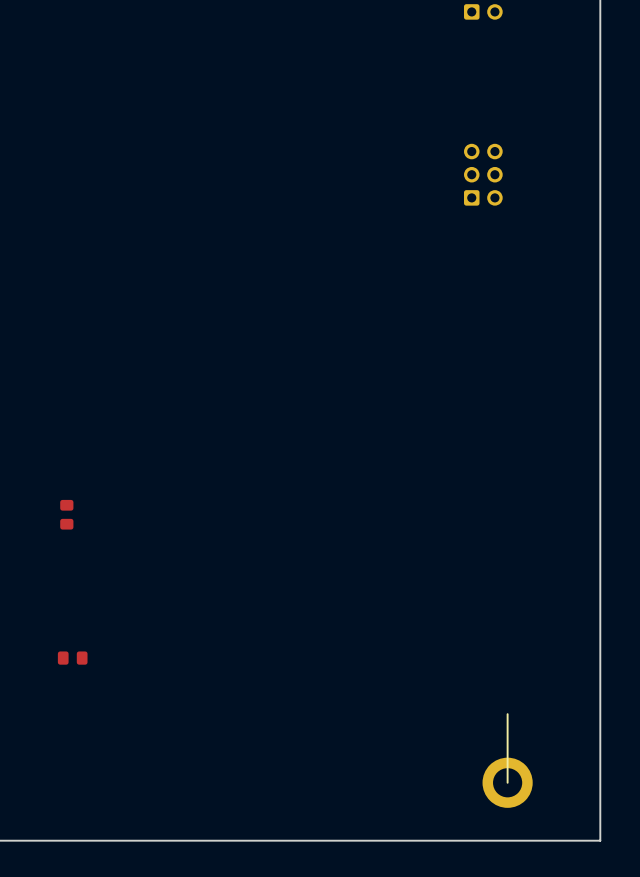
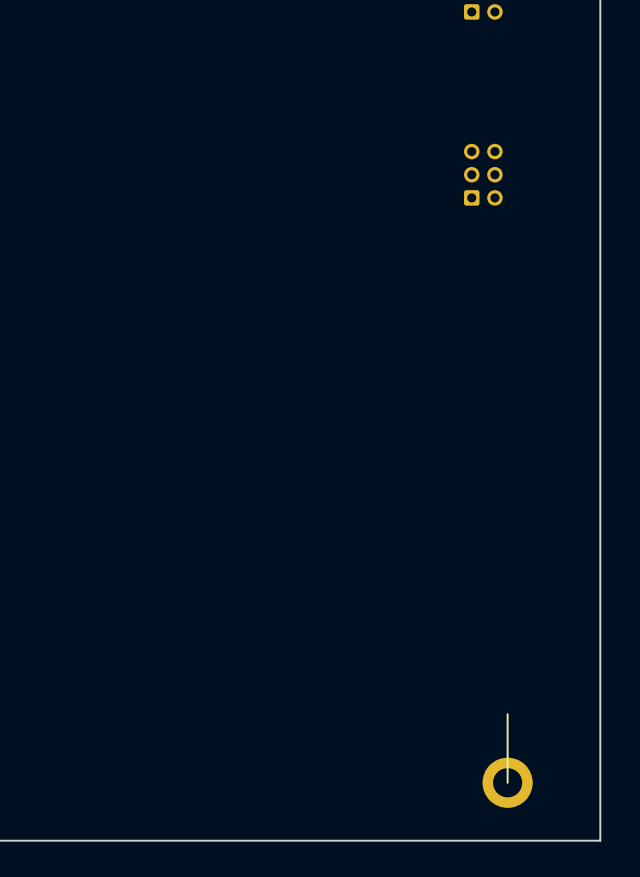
part: (66, 514) -> none
part: (72, 658) -> none

